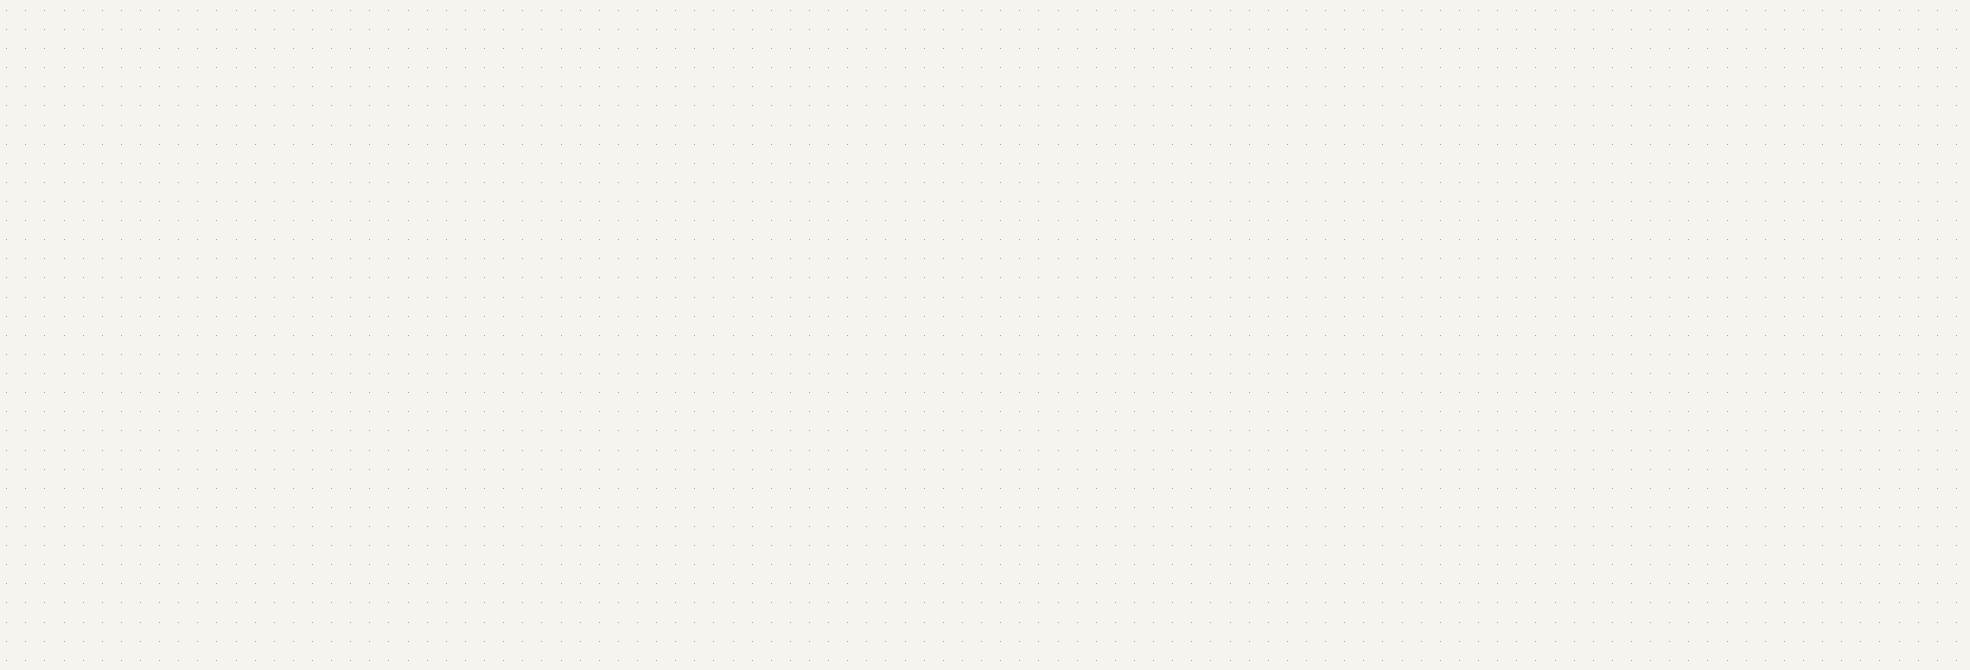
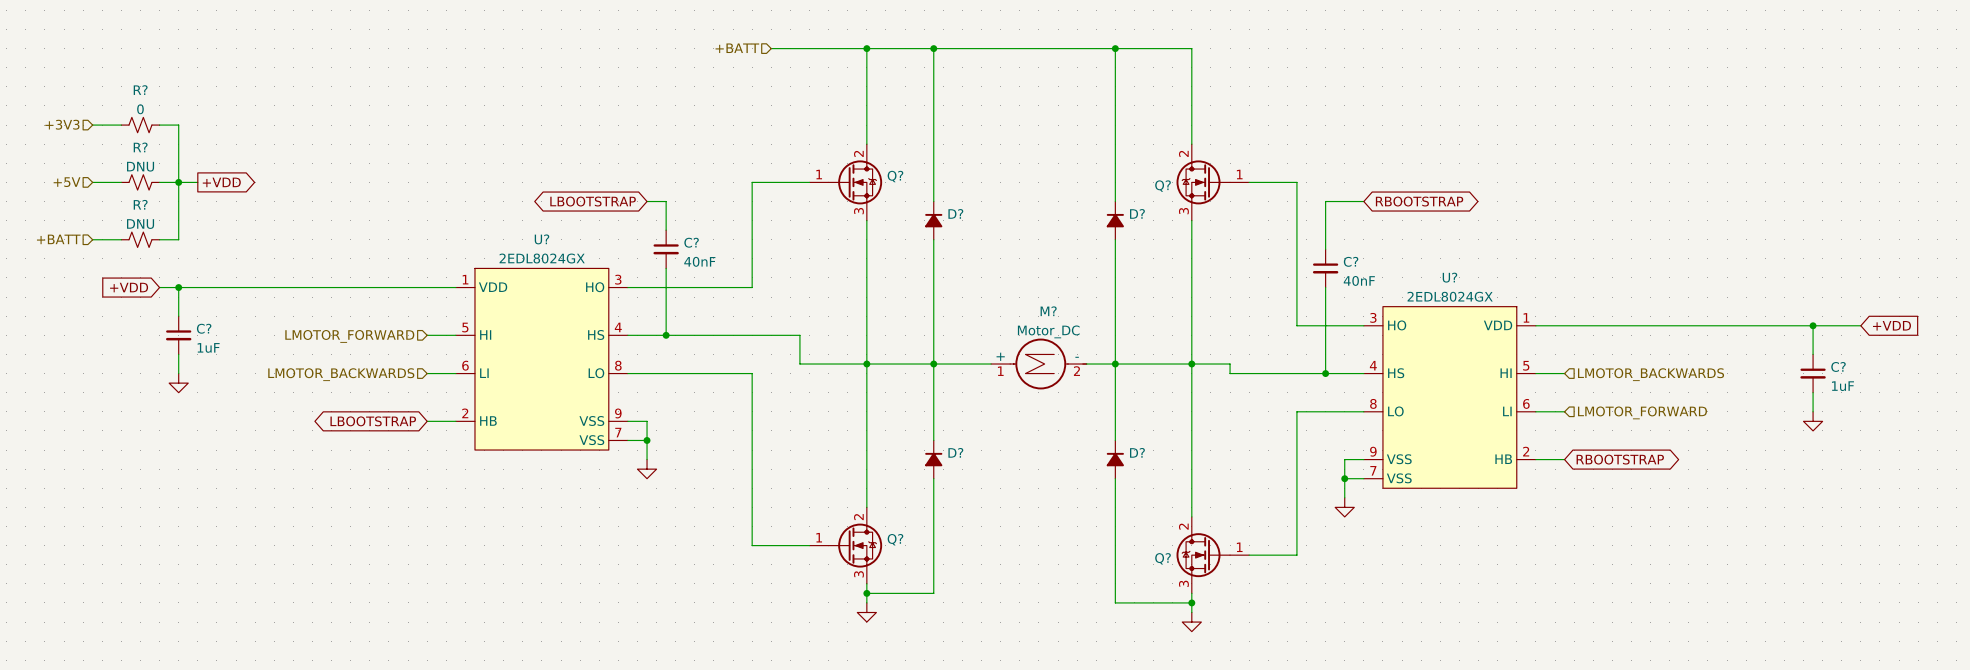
hierarchical label: none -> +BATT (737, 48)
wire: none -> (771, 48) (1191, 48) (1191, 144)
wire: none -> (866, 48) (866, 144)
junction: none -> (866, 48)
wire: none -> (933, 48) (933, 201)
junction: none -> (933, 48)
wire: none -> (1115, 48) (1115, 201)
junction: none -> (1115, 48)
hierarchical label: none -> +3V3 (62, 124)
wire: none -> (92, 125) (121, 125)
R?: none -> 0 (140, 125)
wire: none -> (159, 125) (178, 125) (178, 239) (159, 239)
hierarchical label: none -> +5V (67, 182)
wire: none -> (92, 182) (121, 182)
R?: none -> DNU (140, 182)
wire: none -> (159, 182) (197, 182)
junction: none -> (178, 182)
global label: none -> +VDD (221, 182)
wire: none -> (809, 182) (752, 182) (752, 287) (627, 287)
Q?: none -> (845, 182)
Q?: none -> (1212, 182)
wire: none -> (1249, 182) (1296, 182) (1296, 325) (1363, 325)
global label: none -> LBOOTSTRAP (593, 201)
wire: none -> (647, 201) (666, 201) (666, 230)
wire: none -> (1363, 201) (1325, 201) (1325, 249)
global label: none -> RBOOTSTRAP (1419, 201)
wire: none -> (866, 220) (866, 507)
D?: none -> (933, 220)
D?: none -> (1115, 220)
wire: none -> (1191, 220) (1191, 516)
hierarchical label: none -> +BATT (58, 239)
wire: none -> (92, 239) (121, 239)
R?: none -> DNU (140, 239)
wire: none -> (933, 239) (933, 440)
wire: none -> (1115, 239) (1115, 440)
C?: none -> 40nF (666, 249)
wire: none -> (666, 268) (666, 335)
C?: none -> 40nF (1325, 268)
global label: none -> +VDD (129, 287)
wire: none -> (159, 287) (455, 287)
wire: none -> (178, 287) (178, 316)
junction: none -> (178, 287)
wire: none -> (1325, 287) (1325, 373)
wire: none -> (1535, 325) (1860, 325)
wire: none -> (1813, 325) (1813, 354)
junction: none -> (1813, 325)
global label: none -> +VDD (1891, 325)
C?: none -> 1uF (178, 335)
wire: none -> (427, 335) (455, 335)
wire: none -> (627, 335) (799, 335) (799, 364) (991, 364)
junction: none -> (666, 335)
hierarchical label: none -> LMOTOR_FORWARD (349, 336)
wire: none -> (178, 354) (178, 373)
U?: none -> 2EDL8024GX (541, 359)
junction: none -> (866, 364)
junction: none -> (933, 364)
M?: none -> Motor_DC (1038, 364)
wire: none -> (1086, 364) (1230, 364) (1230, 373) (1363, 373)
junction: none -> (1115, 364)
junction: none -> (1191, 364)
wire: none -> (427, 373) (455, 373)
wire: none -> (627, 373) (752, 373) (752, 545) (809, 545)
junction: none -> (1325, 373)
wire: none -> (1535, 373) (1564, 373)
C?: none -> 1uF (1813, 373)
hierarchical label: none -> LMOTOR_BACKWARDS (341, 374)
hierarchical label: none -> LMOTOR_BACKWARDS (1651, 374)
power symbol: none -> (178, 383)
wire: none -> (1813, 392) (1813, 411)
U?: none -> 2EDL8024GX (1449, 397)
wire: none -> (1363, 411) (1296, 411) (1296, 555) (1249, 555)
wire: none -> (1535, 411) (1564, 411)
hierarchical label: none -> LMOTOR_FORWARD (1642, 412)
global label: none -> LBOOTSTRAP (373, 421)
wire: none -> (427, 421) (455, 421)
wire: none -> (627, 421) (647, 421) (647, 459)
power symbol: none -> (1813, 421)
wire: none -> (627, 440) (647, 440)
junction: none -> (647, 440)
D?: none -> (933, 459)
D?: none -> (1115, 459)
wire: none -> (1363, 459) (1344, 459) (1344, 497)
wire: none -> (1535, 459) (1564, 459)
global label: none -> RBOOTSTRAP (1620, 459)
power symbol: none -> (647, 469)
wire: none -> (933, 478) (933, 593) (866, 593)
wire: none -> (1115, 478) (1115, 602) (1191, 602)
wire: none -> (1344, 478) (1363, 478)
junction: none -> (1344, 478)
power symbol: none -> (1344, 507)
Q?: none -> (845, 545)
Q?: none -> (1212, 555)
wire: none -> (866, 583) (866, 602)
junction: none -> (866, 593)
wire: none -> (1191, 593) (1191, 612)
junction: none -> (1191, 602)
power symbol: none -> (866, 612)
power symbol: none -> (1191, 622)

